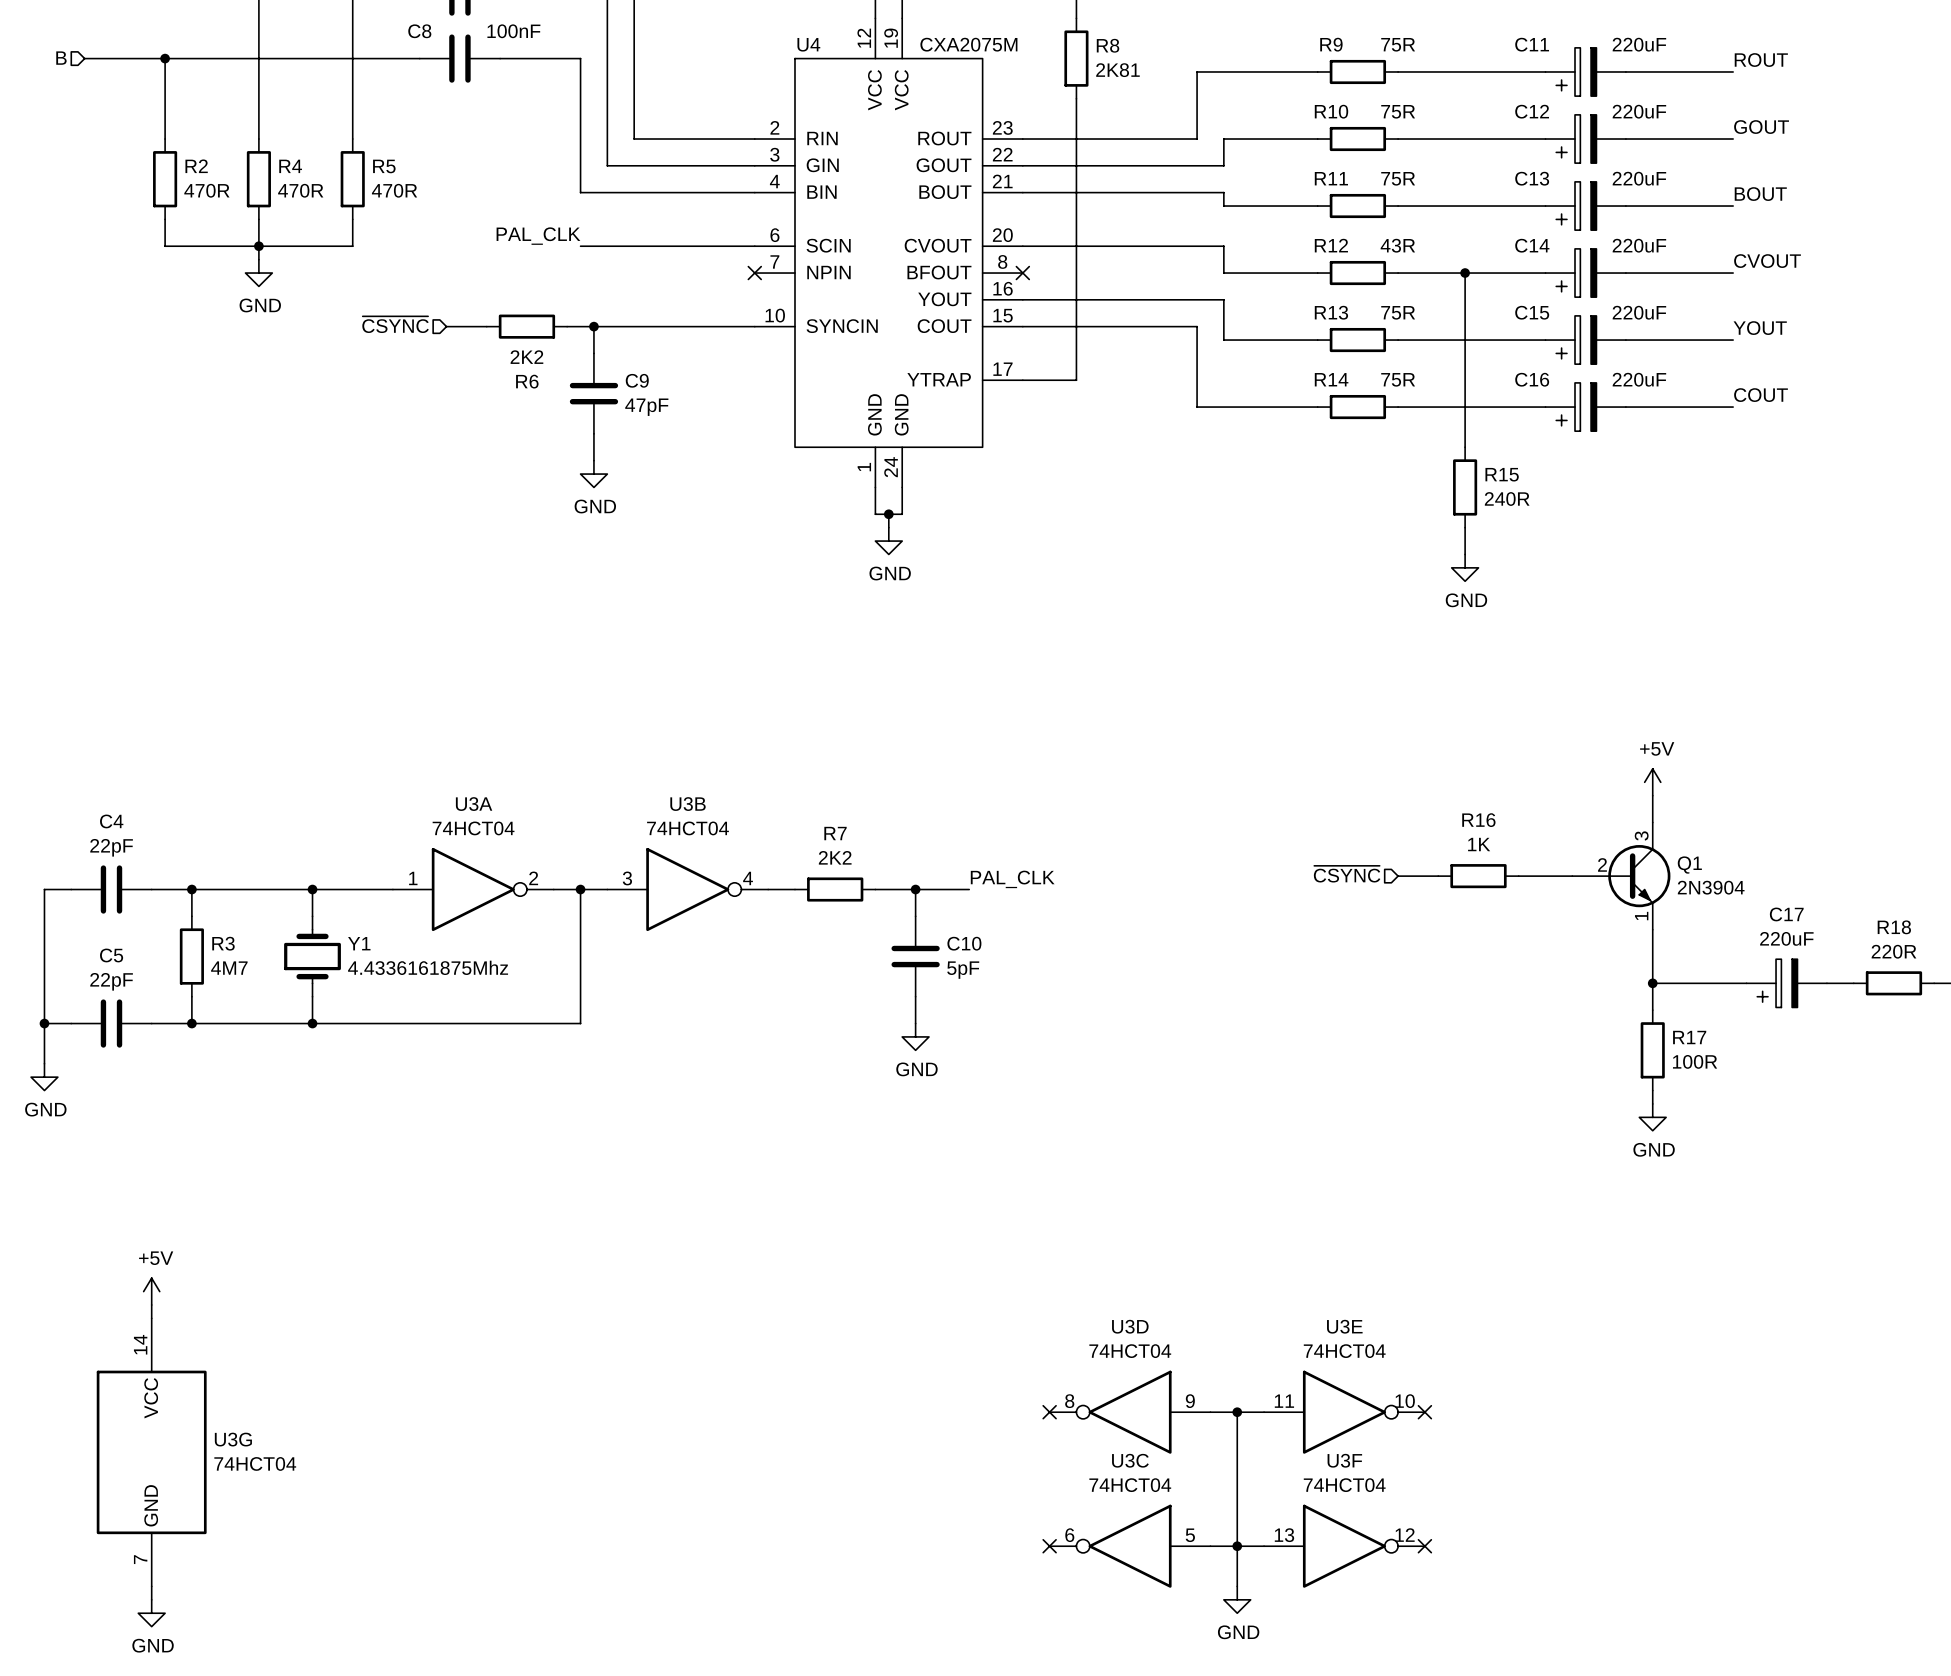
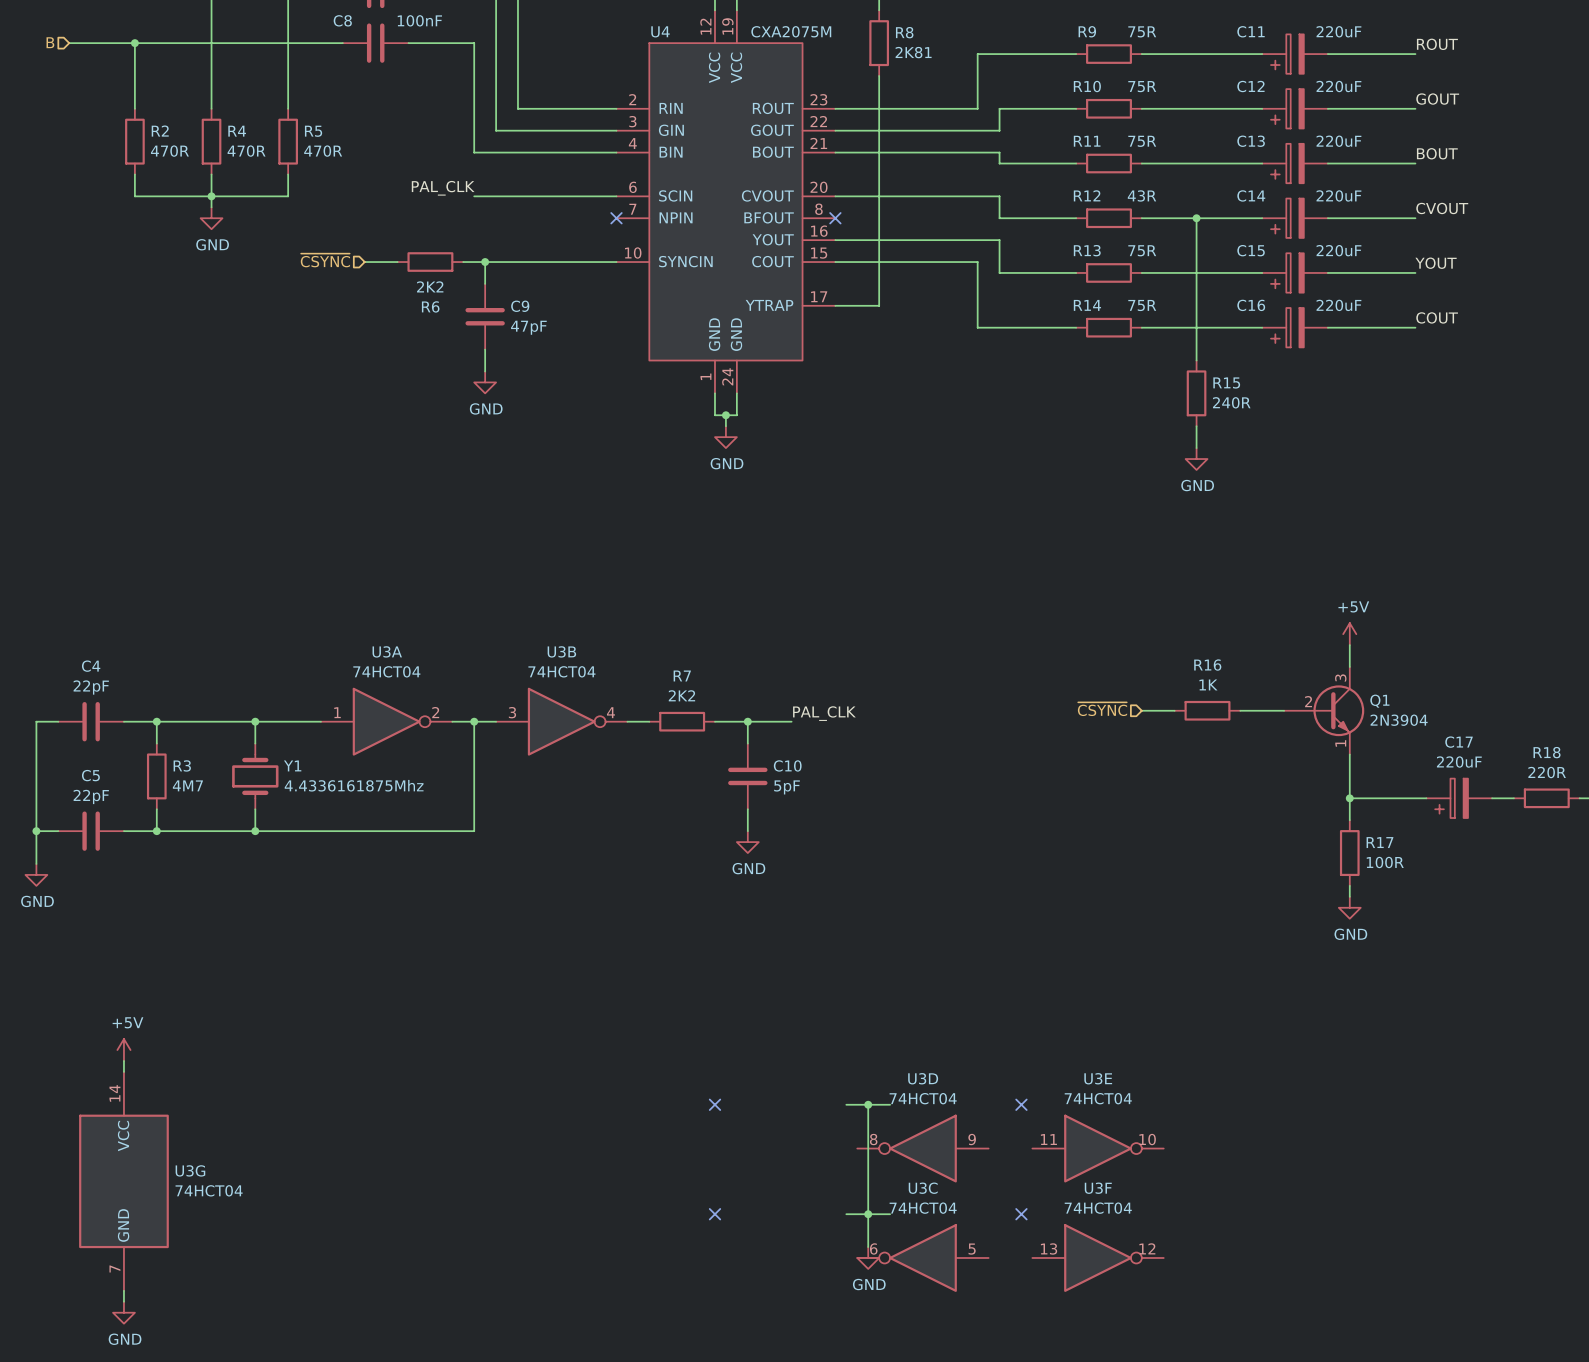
no-connect mark: none -> (714, 1104)
junction: none -> (868, 1104)
no-connect mark: none -> (1021, 1104)
no-connect mark: (1049, 1412) -> none
wire: (1210, 1412) (1264, 1412) -> (846, 1104) (890, 1104)
wire: (1237, 1412) (1237, 1586) -> (868, 1104) (868, 1247)
junction: (1237, 1412) -> none
no-connect mark: (1424, 1412) -> none
no-connect mark: none -> (714, 1214)
junction: none -> (868, 1214)
no-connect mark: none -> (1021, 1214)
no-connect mark: (1049, 1546) -> none
wire: (1210, 1546) (1264, 1546) -> (846, 1214) (890, 1214)
junction: (1237, 1546) -> none
no-connect mark: (1424, 1546) -> none
power symbol position: GND (1237, 1599) -> GND (868, 1258)

